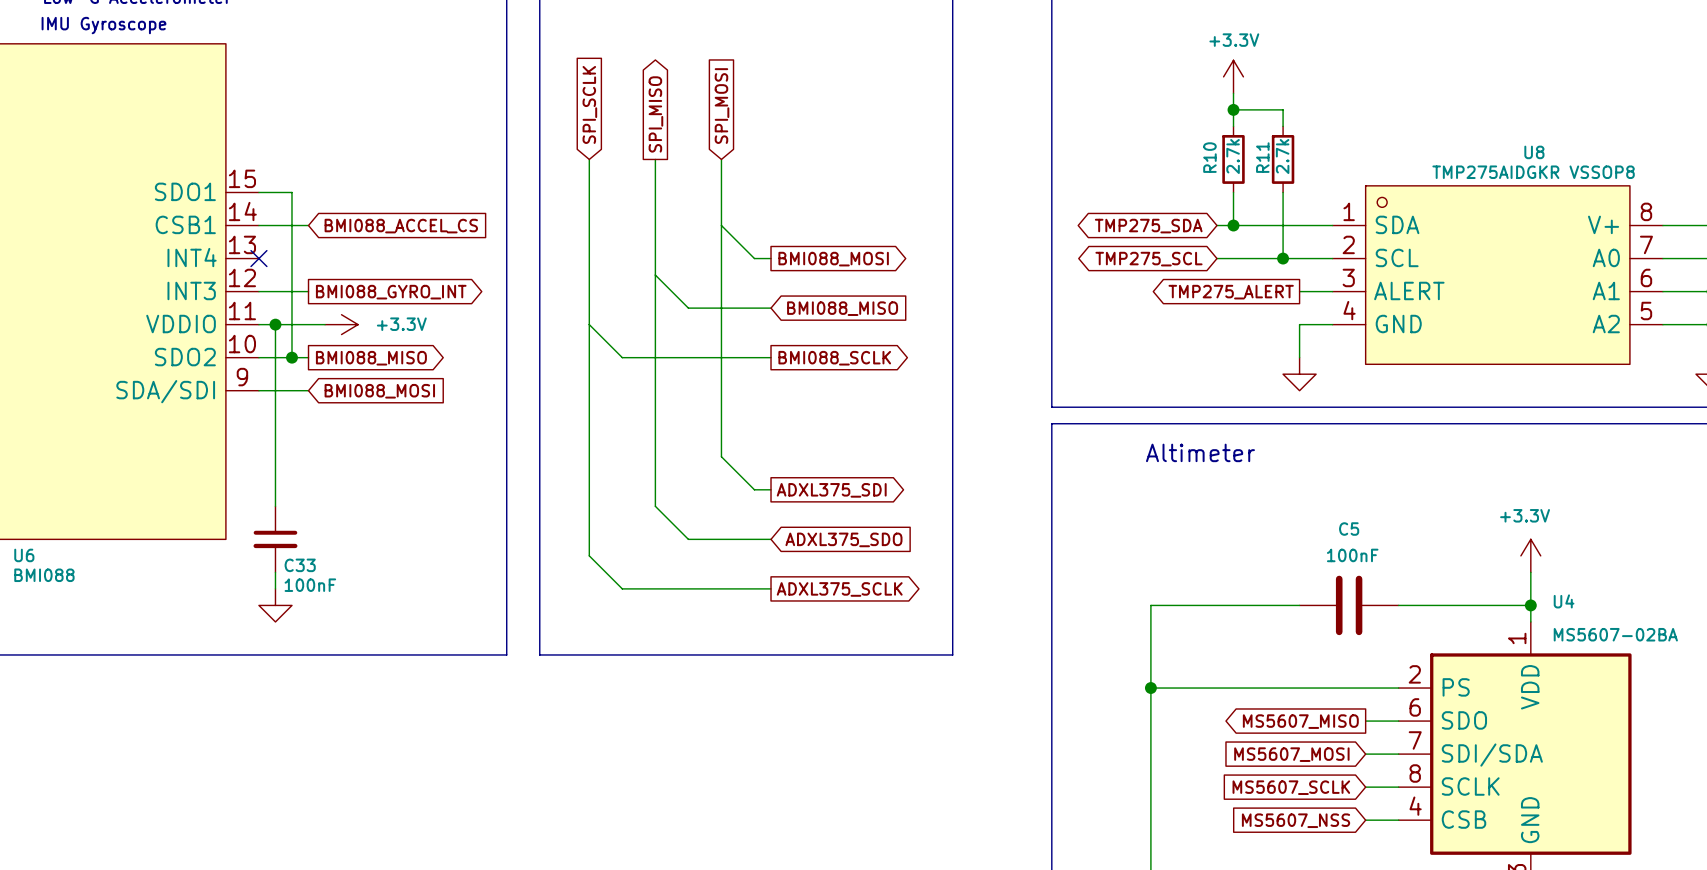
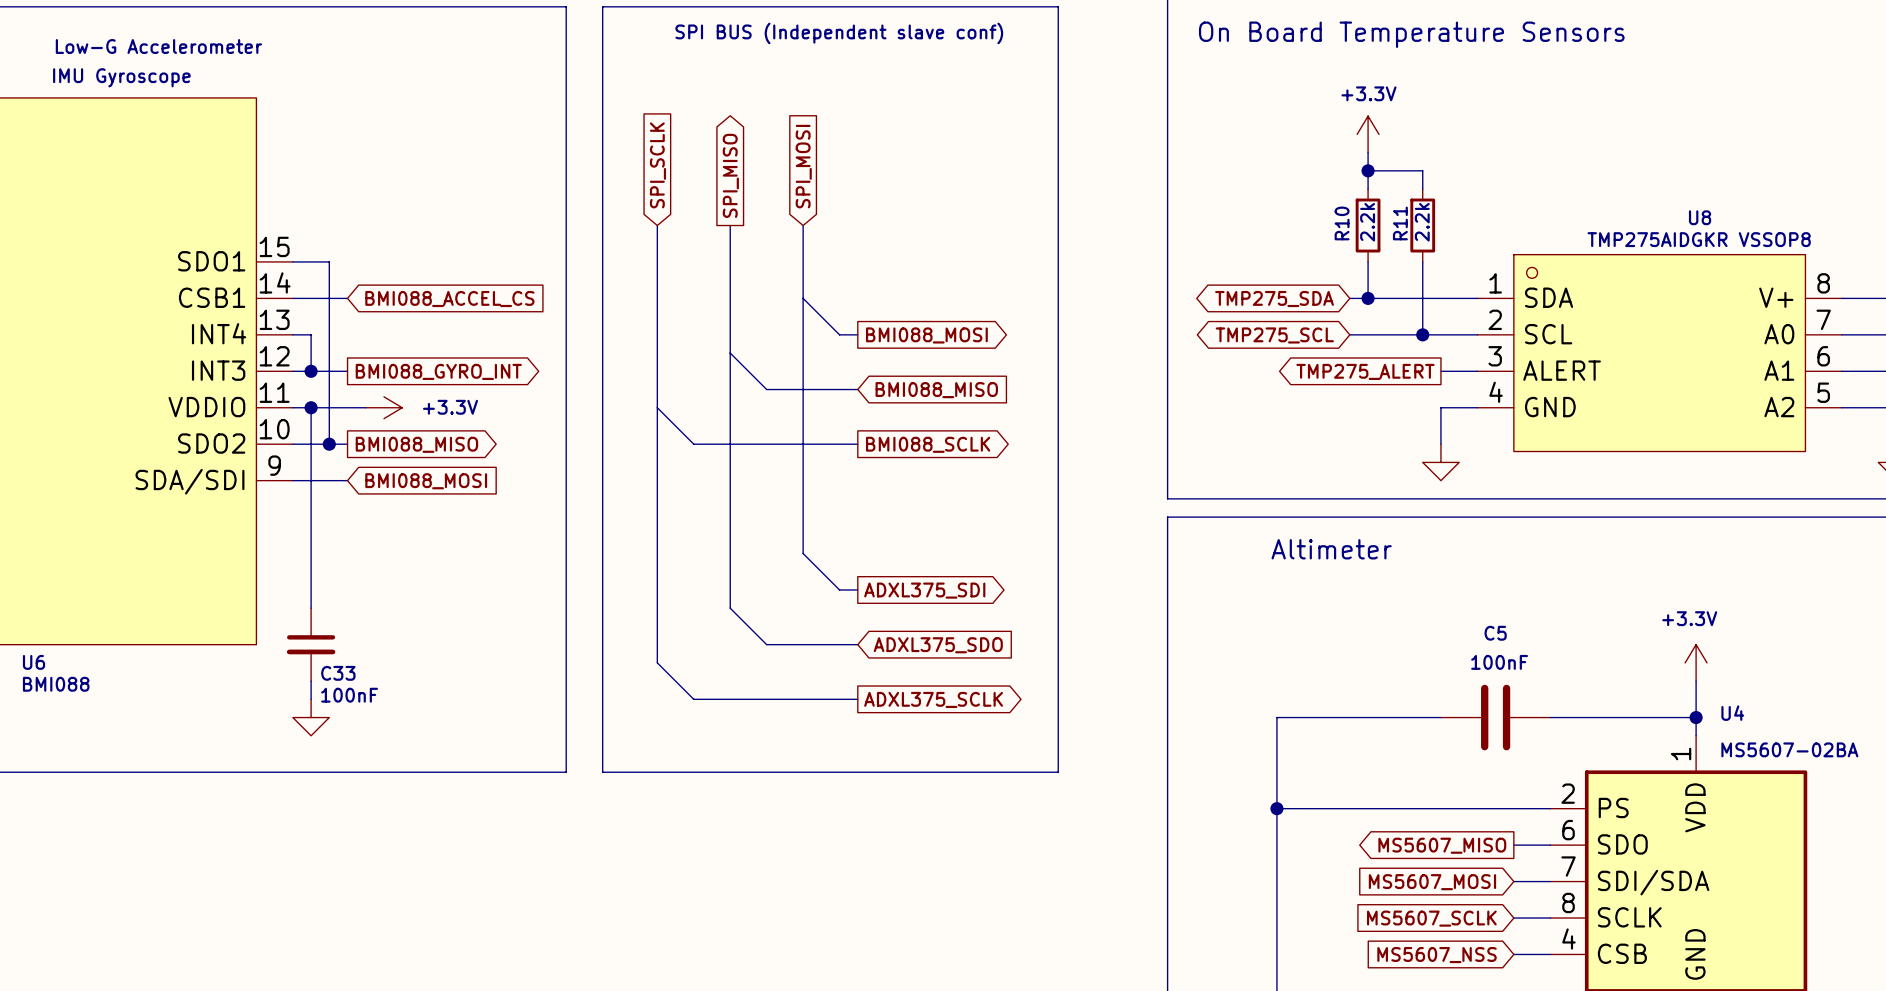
R10 value: 2.7k (1233, 156) -> 2.2k (1367, 222)
R11 value: 2.7k (1282, 156) -> 2.2k (1422, 222)
wire: none -> (292, 334) (311, 334) (311, 371)
no-connect mark: (258, 258) -> none
junction: none -> (311, 371)

